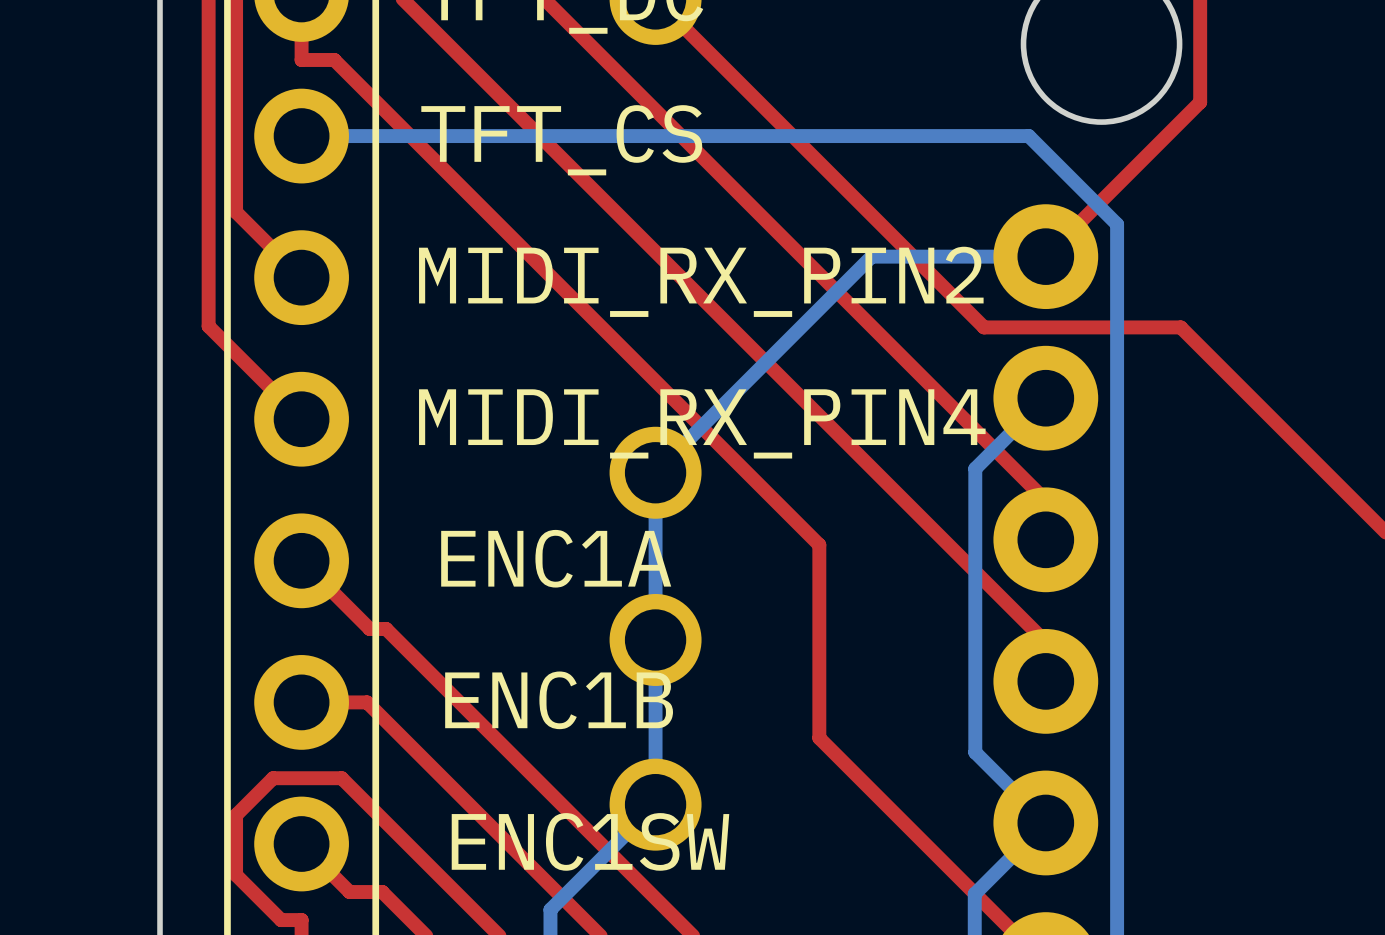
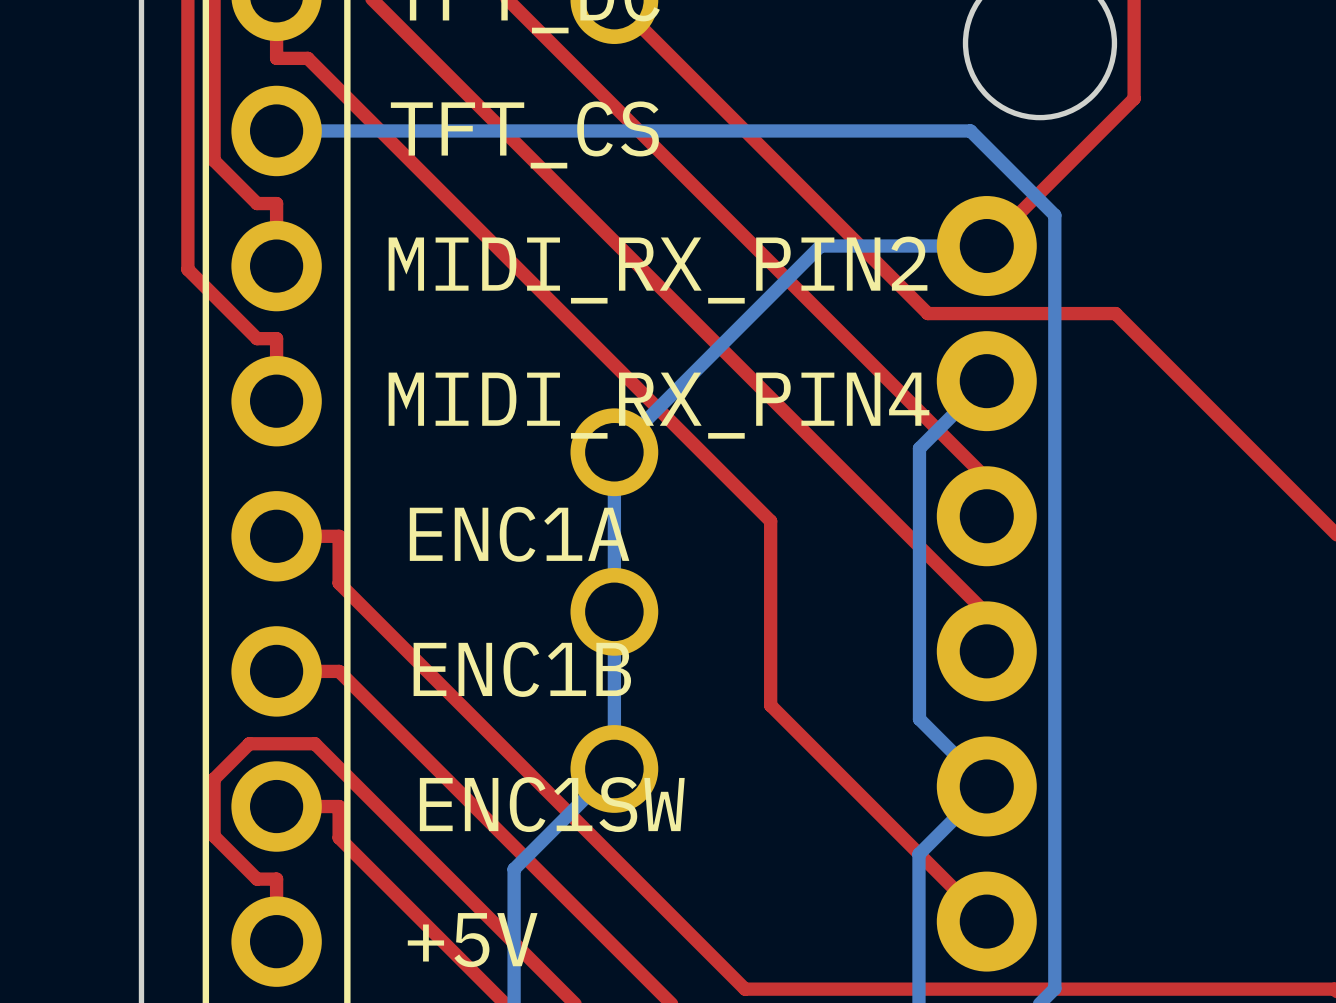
top track: (236, 167) (236, 212) (301, 277) -> (214, 160) (257, 203) (276, 203) (276, 266)
top track: (208, 281) (208, 326) (301, 419) -> (187, 269) (257, 338) (276, 338) (276, 401)
top track: (301, 560) (369, 629) (386, 629) -> (276, 536) (339, 536) (339, 583) (357, 601)
top track: (301, 844) (349, 892) (382, 892) -> (276, 806) (339, 806) (339, 837) (353, 852)

